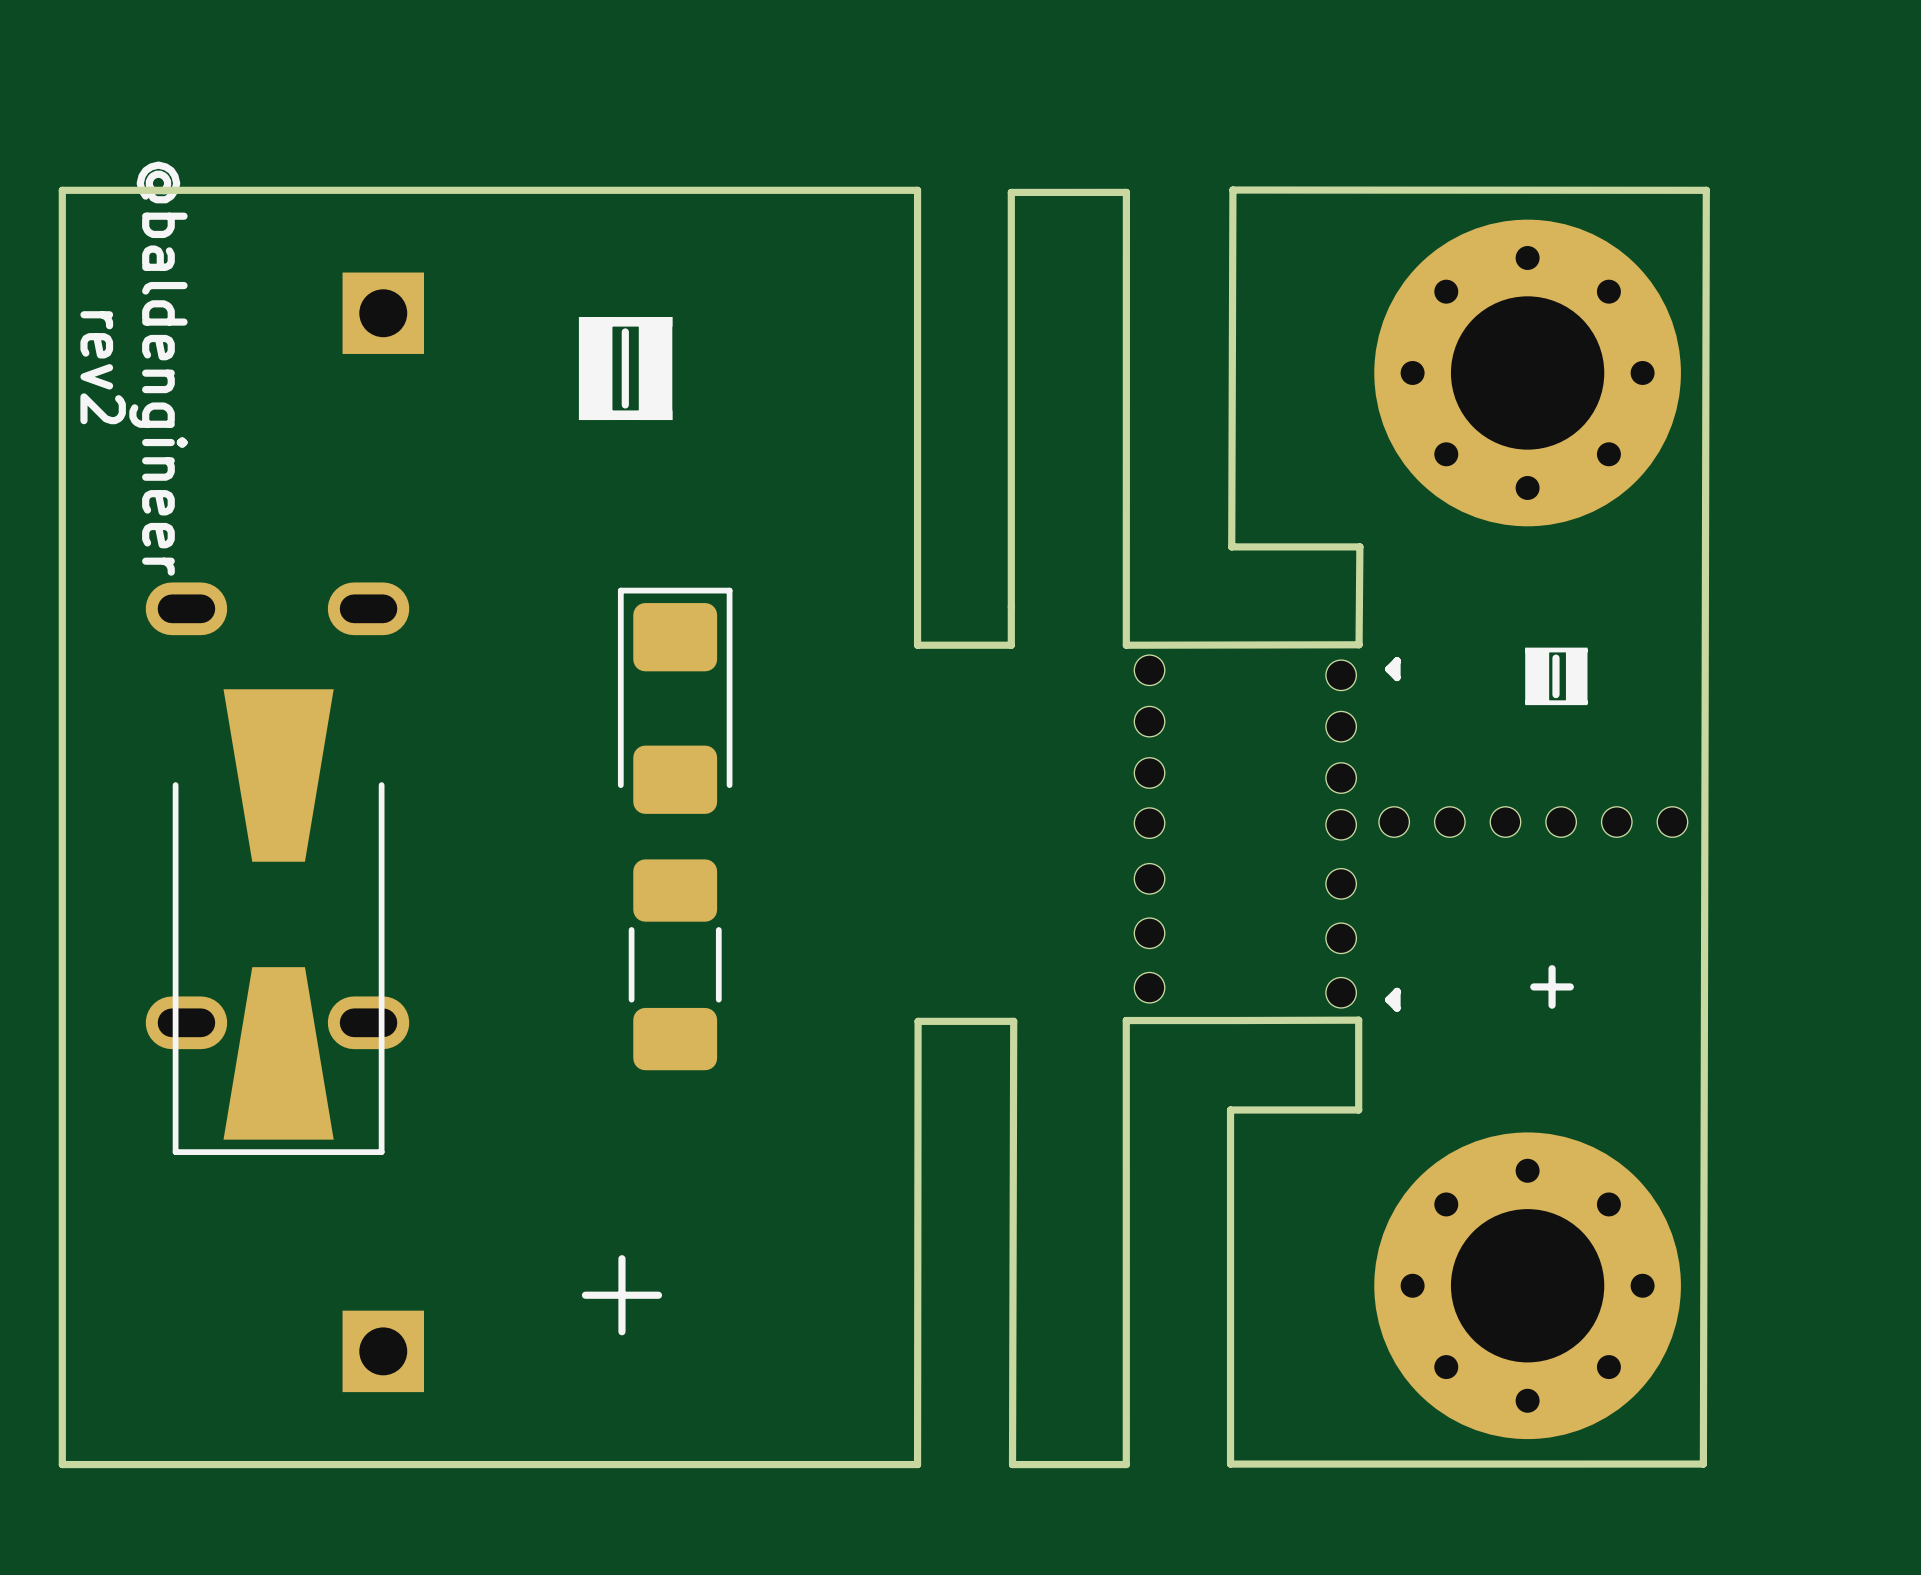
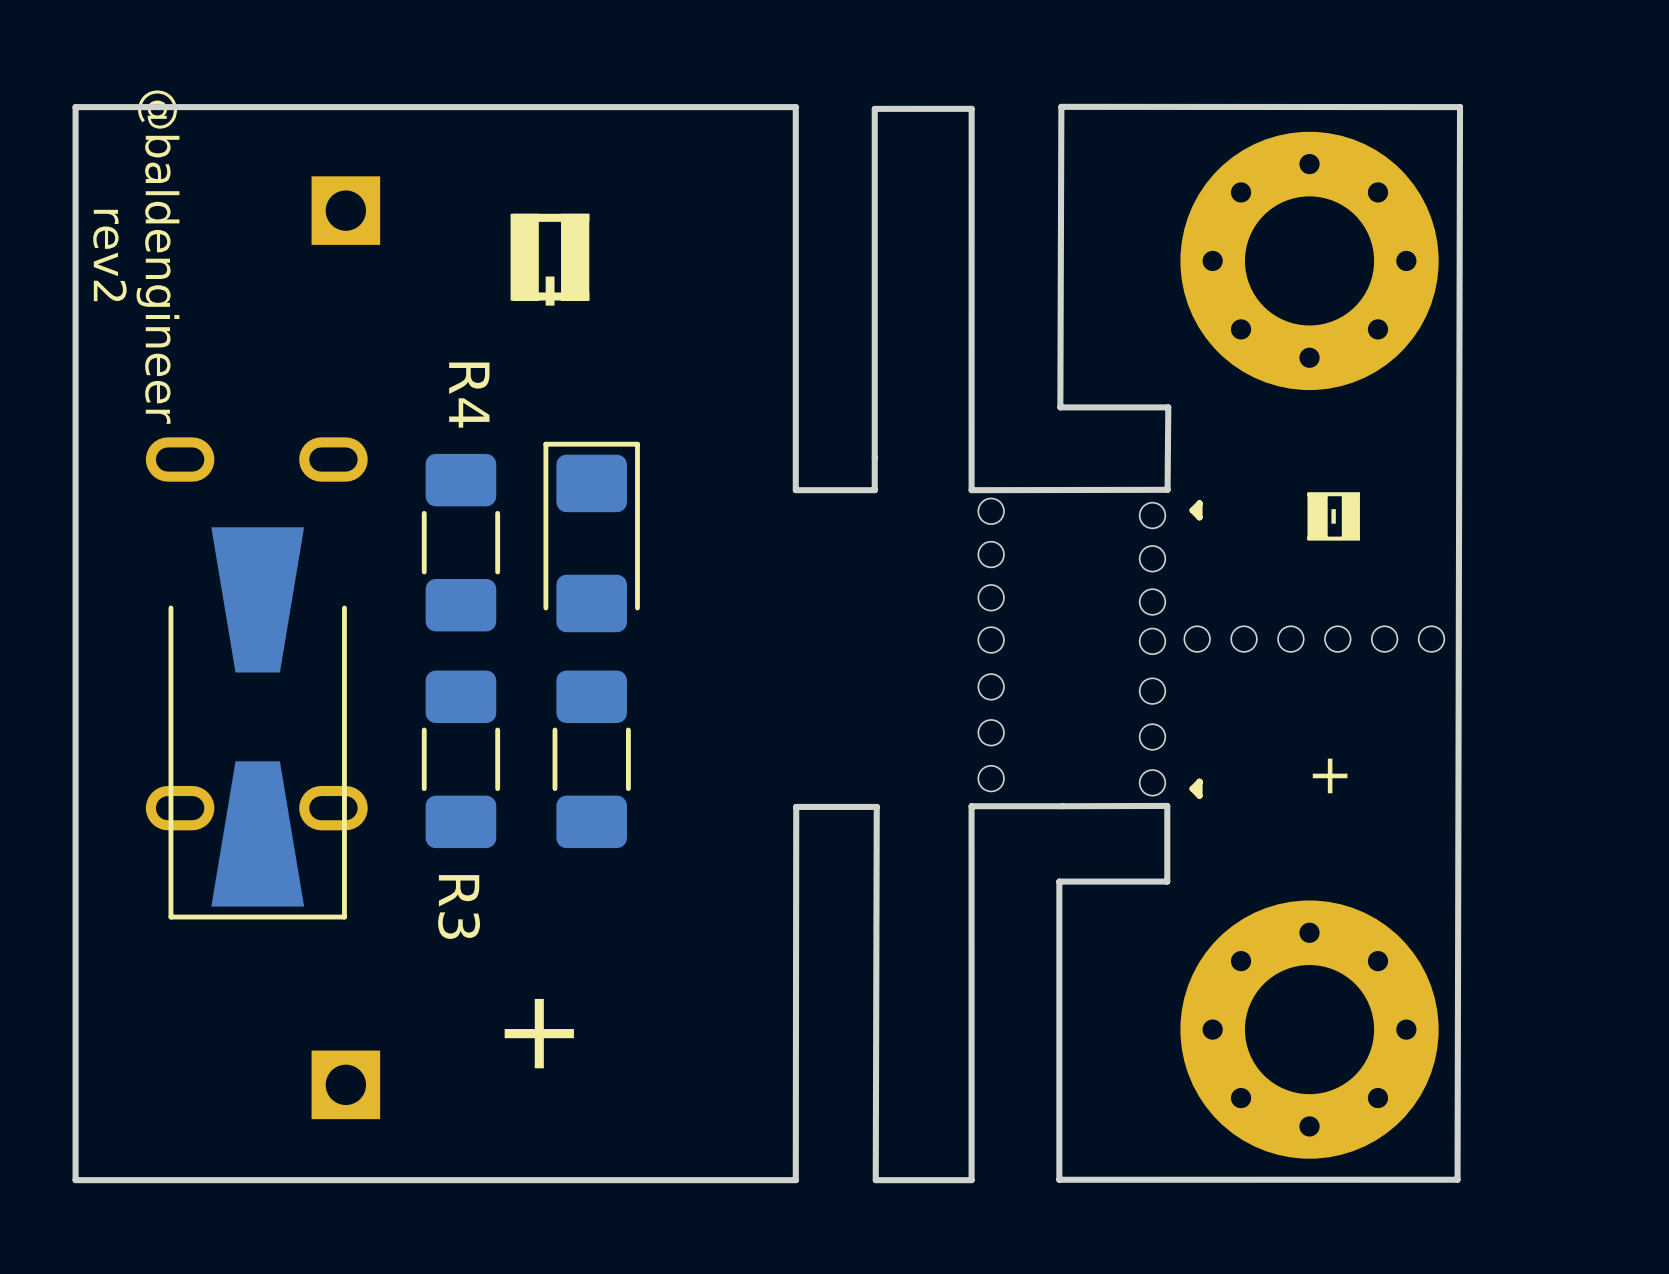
R4: none -> (460, 542)
R3: none -> (460, 759)

